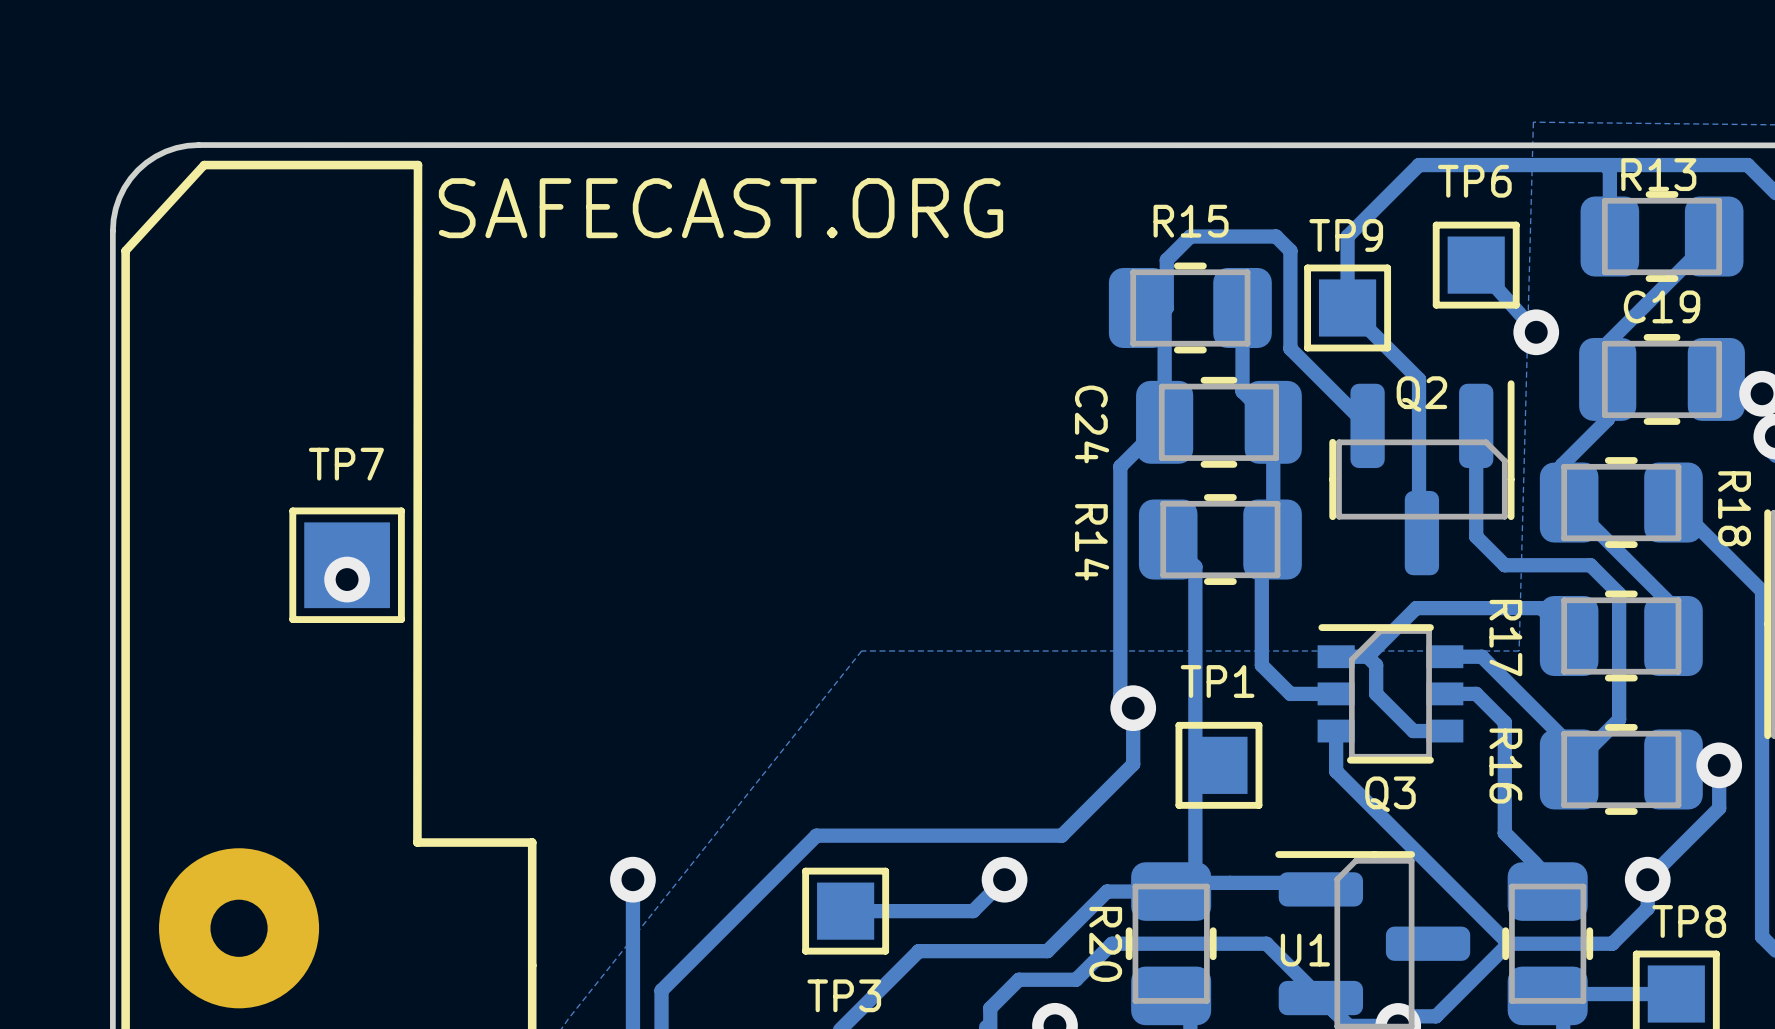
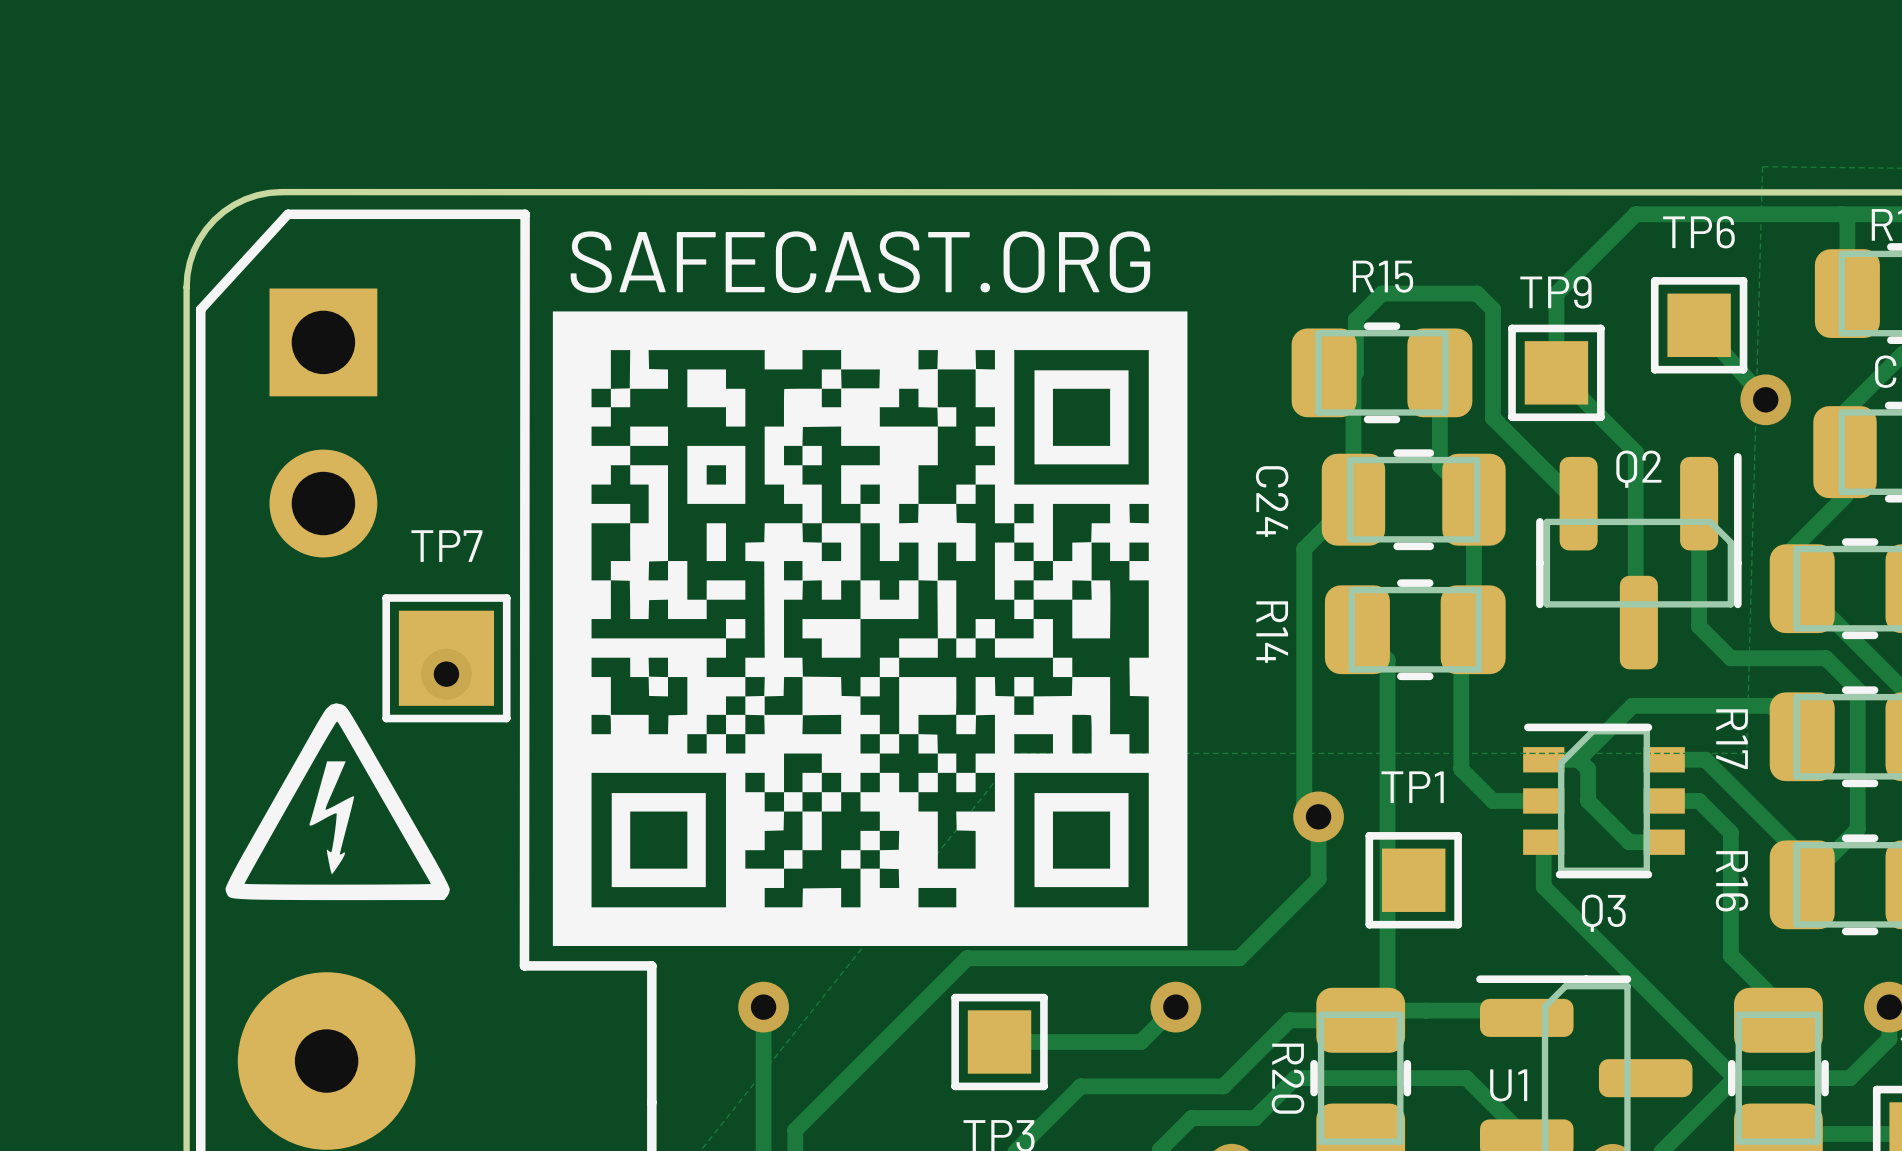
drawing: none -> [552, 311, 1188, 947]
part: none -> (323, 422)
drawing: none -> [225, 703, 450, 901]

